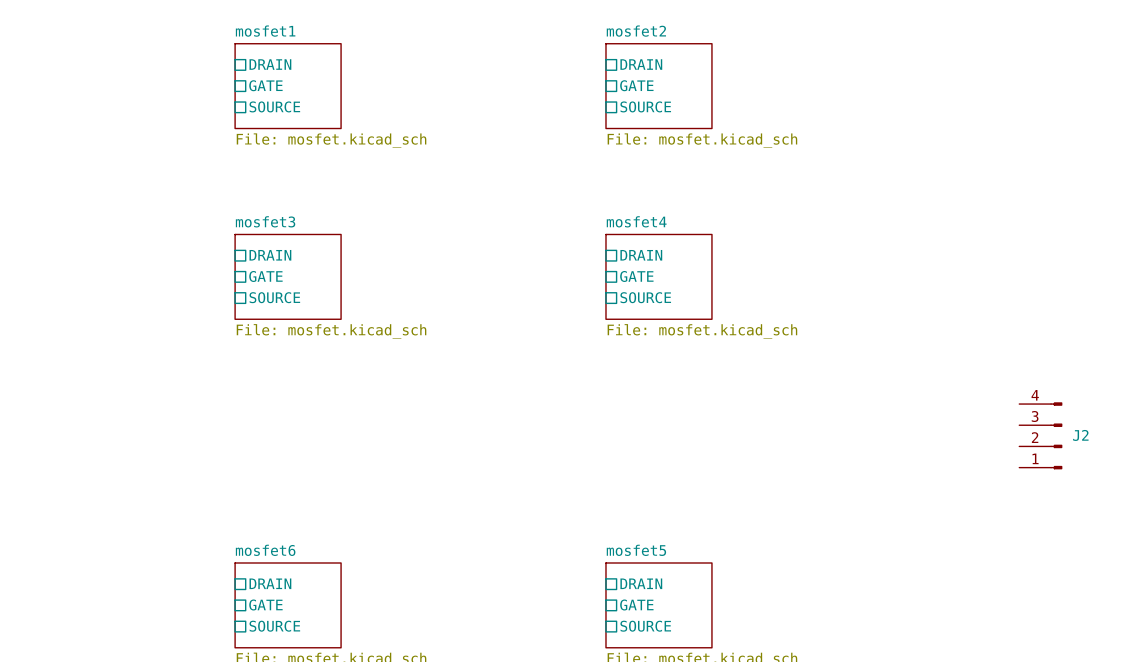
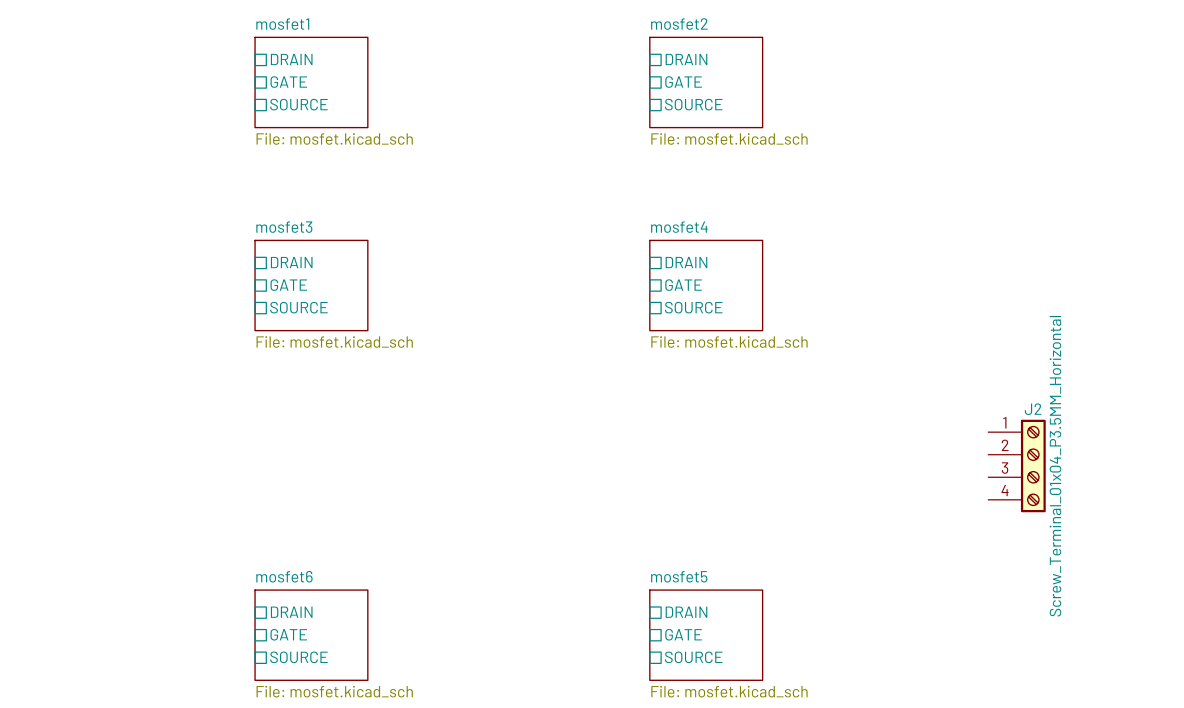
J2 symbol: [1019, 402, 1063, 470] -> [988, 419, 1046, 513]
J2 name position: J2 (1080, 435) -> J2 (1033, 409)
J2 value: none -> Screw_Terminal_01x04_P3.5MM_Horizontal (1055, 466)

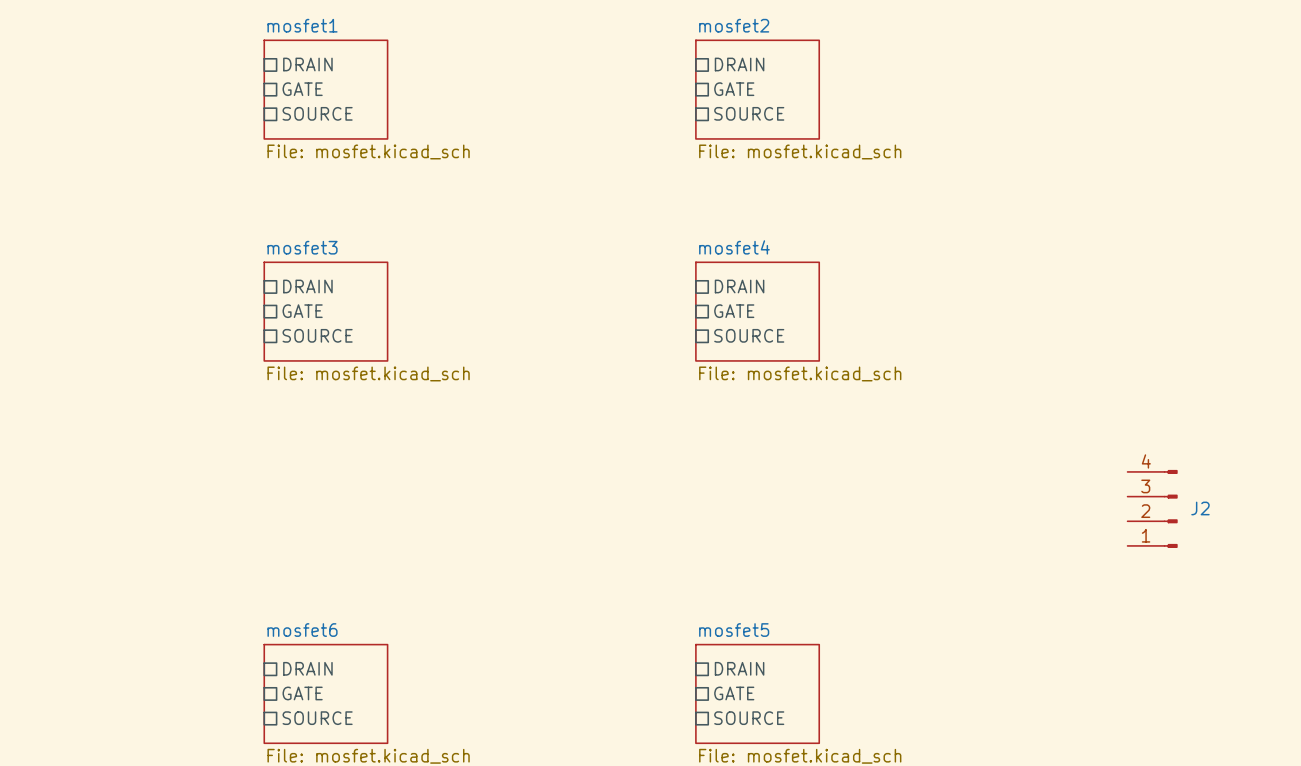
J2 name position: J2 (1033, 409) -> J2 (1200, 508)
J2 symbol: [988, 419, 1046, 513] -> [1127, 469, 1178, 548]
J2 value: Screw_Terminal_01x04_P3.5MM_Horizontal (1055, 466) -> none

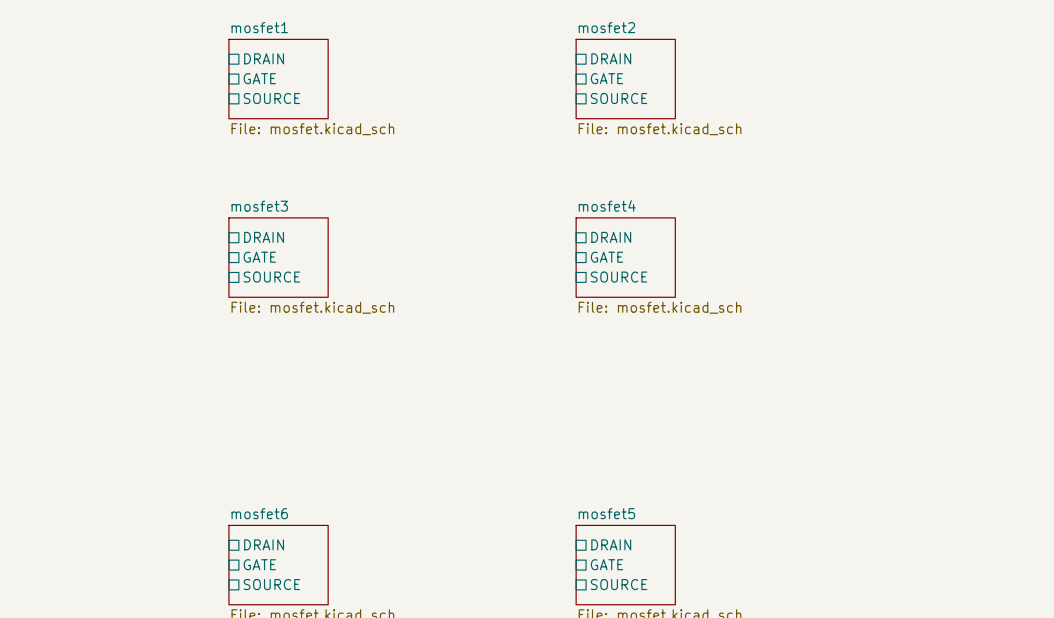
J2: (1152, 508) -> none

